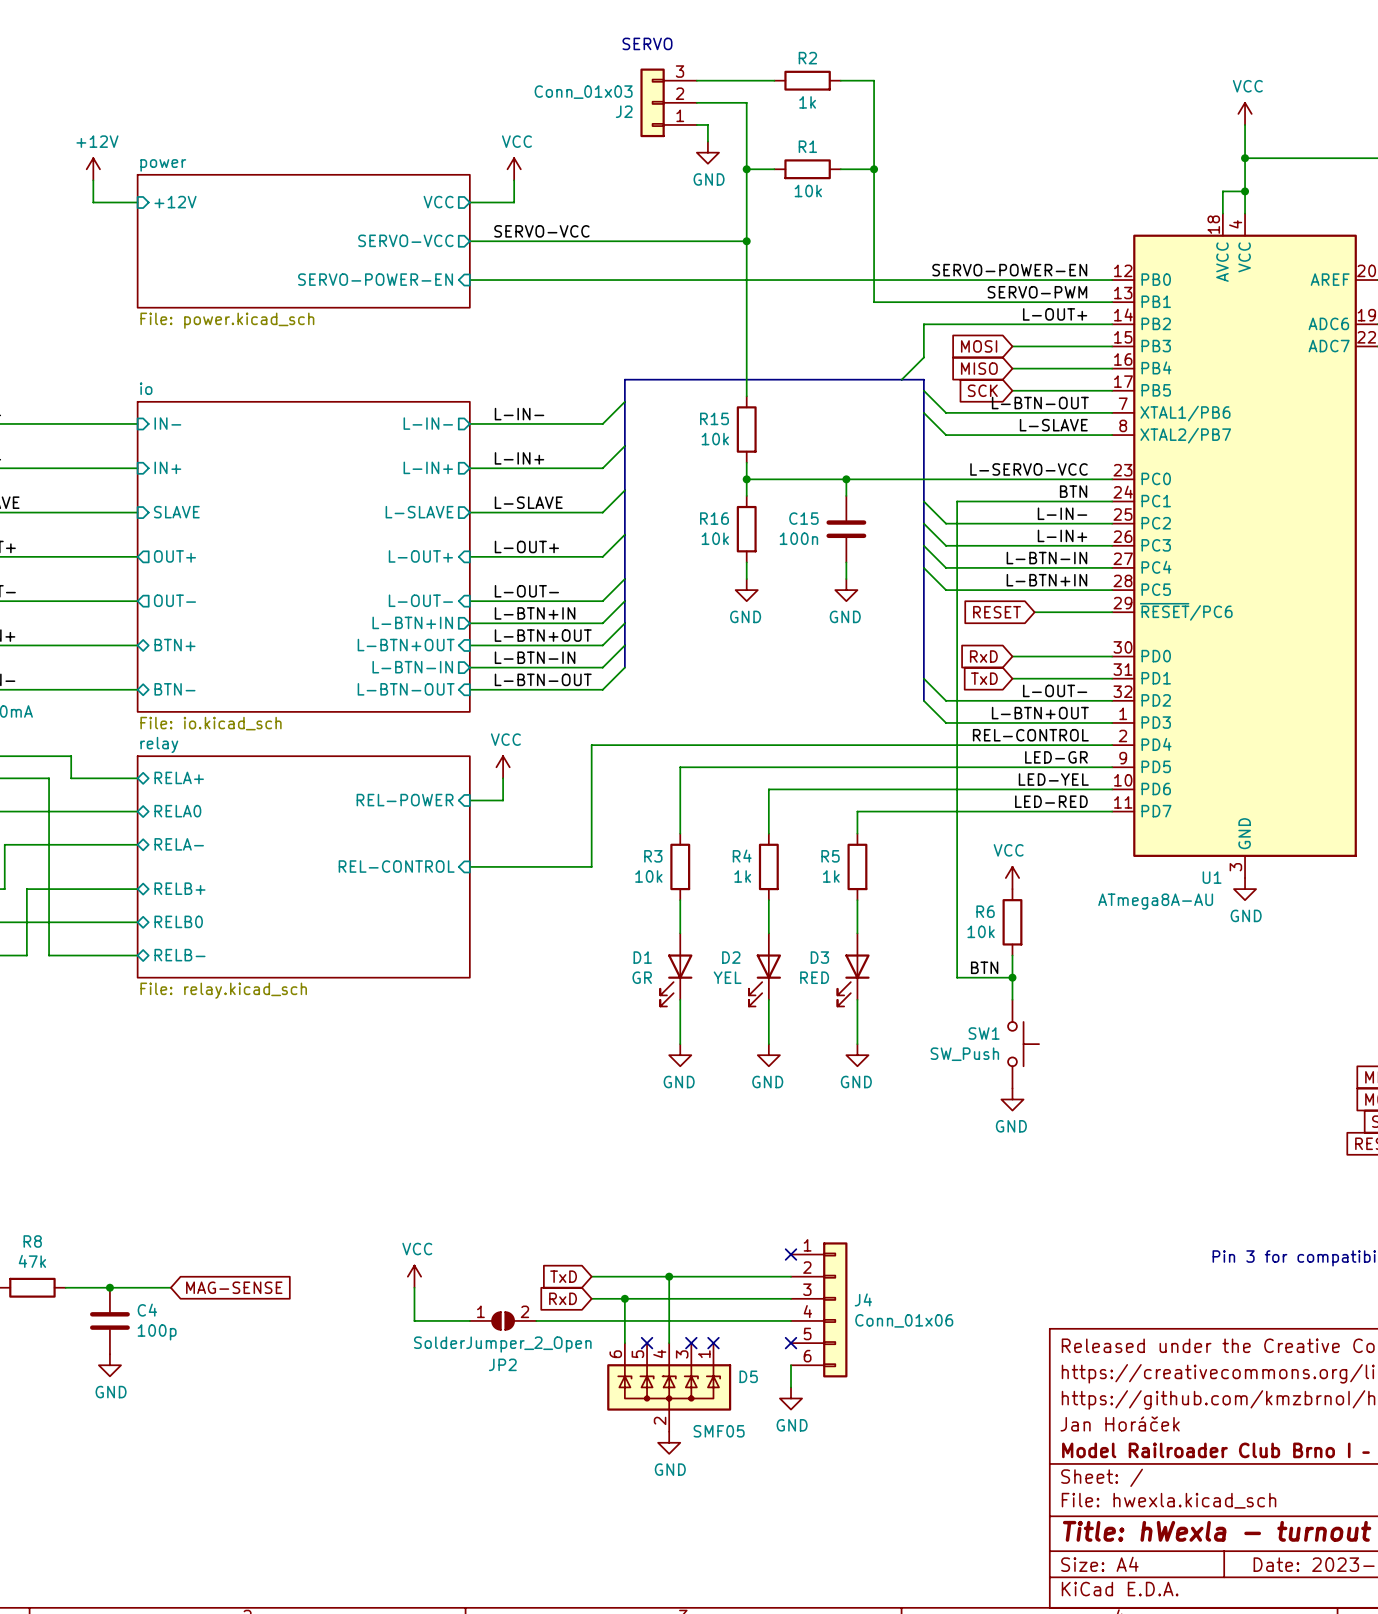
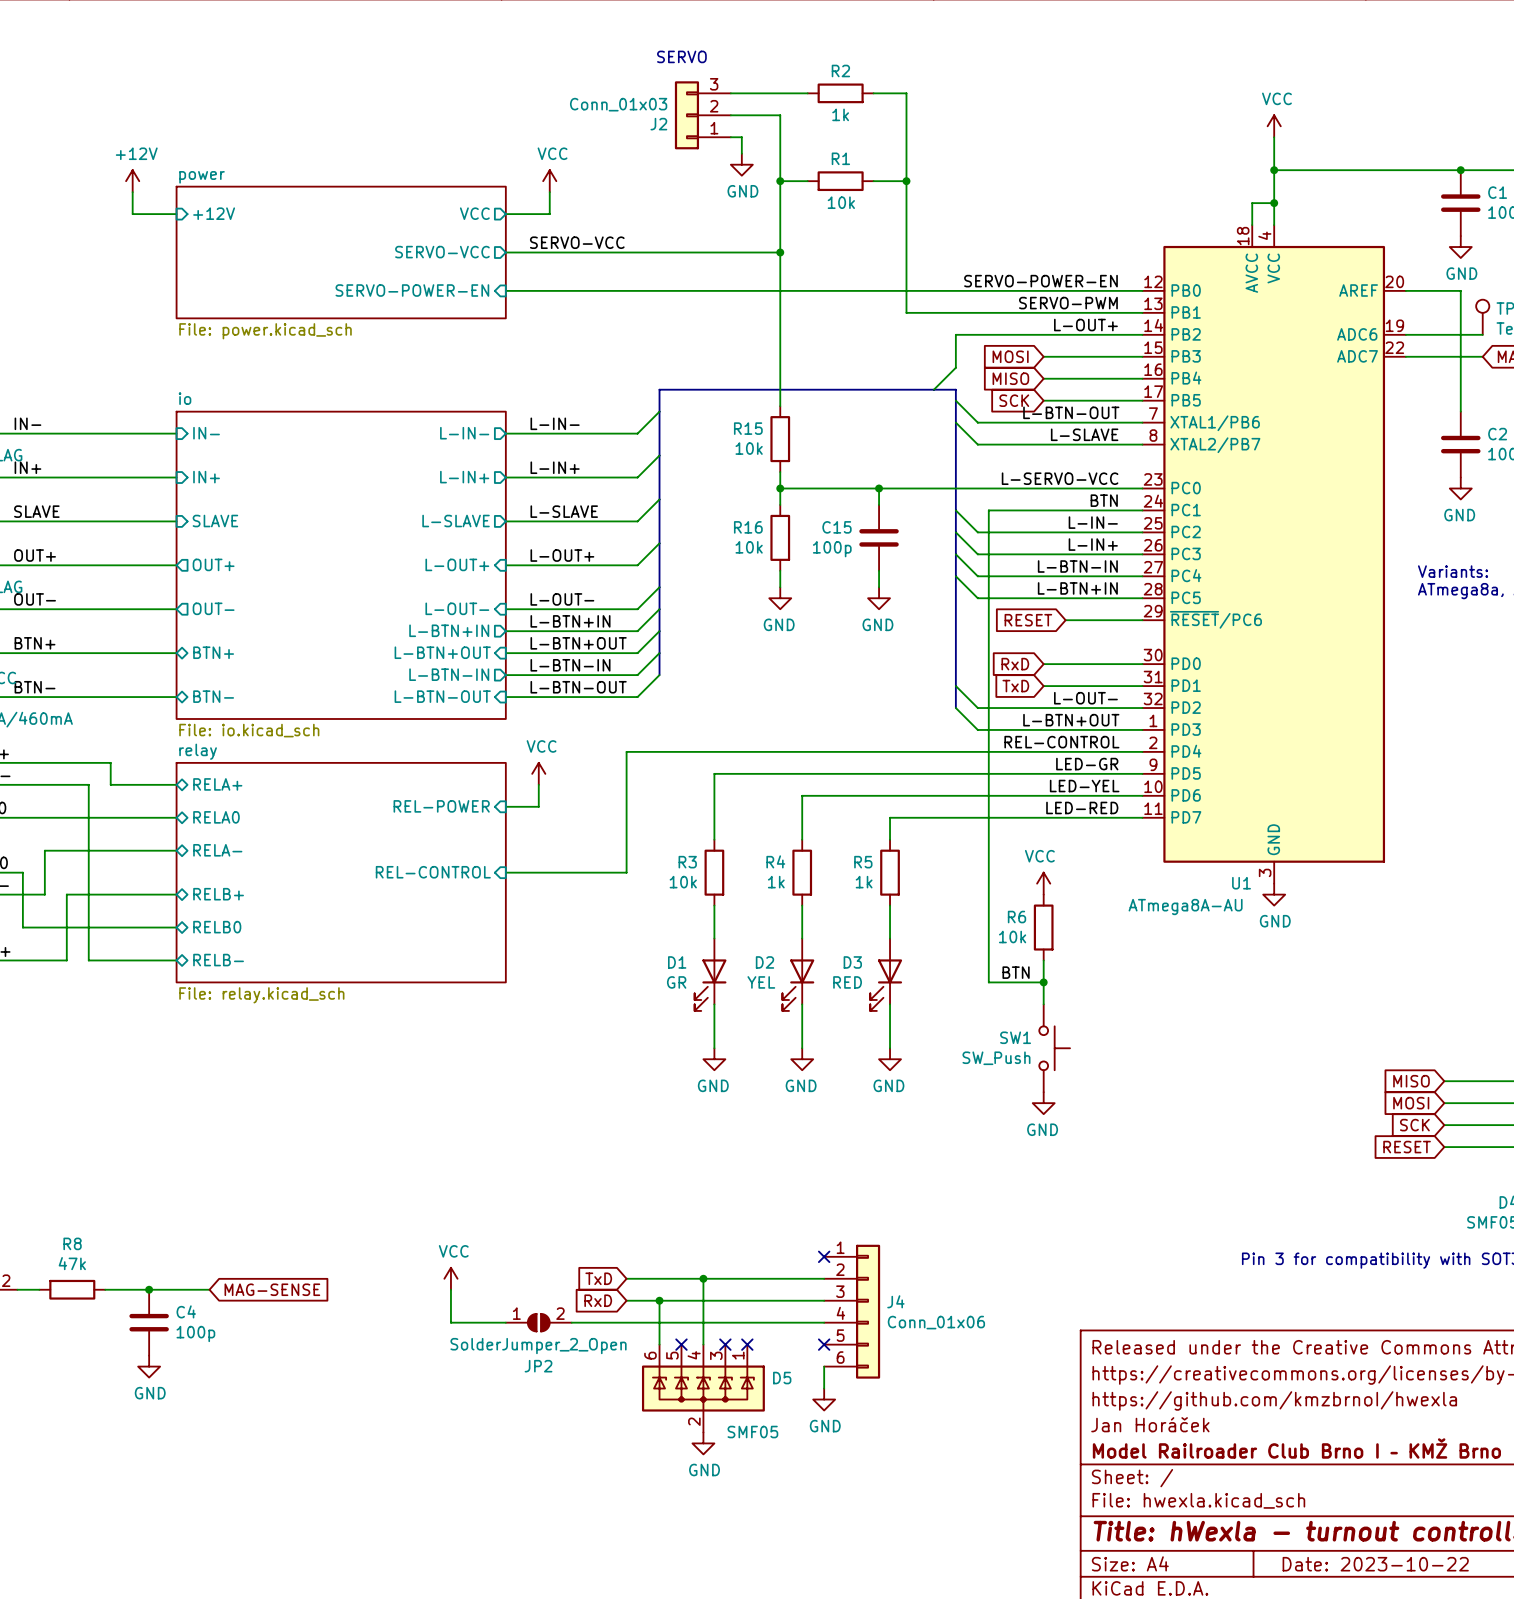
C15 value: 100n (798, 538) -> 100p (832, 549)

